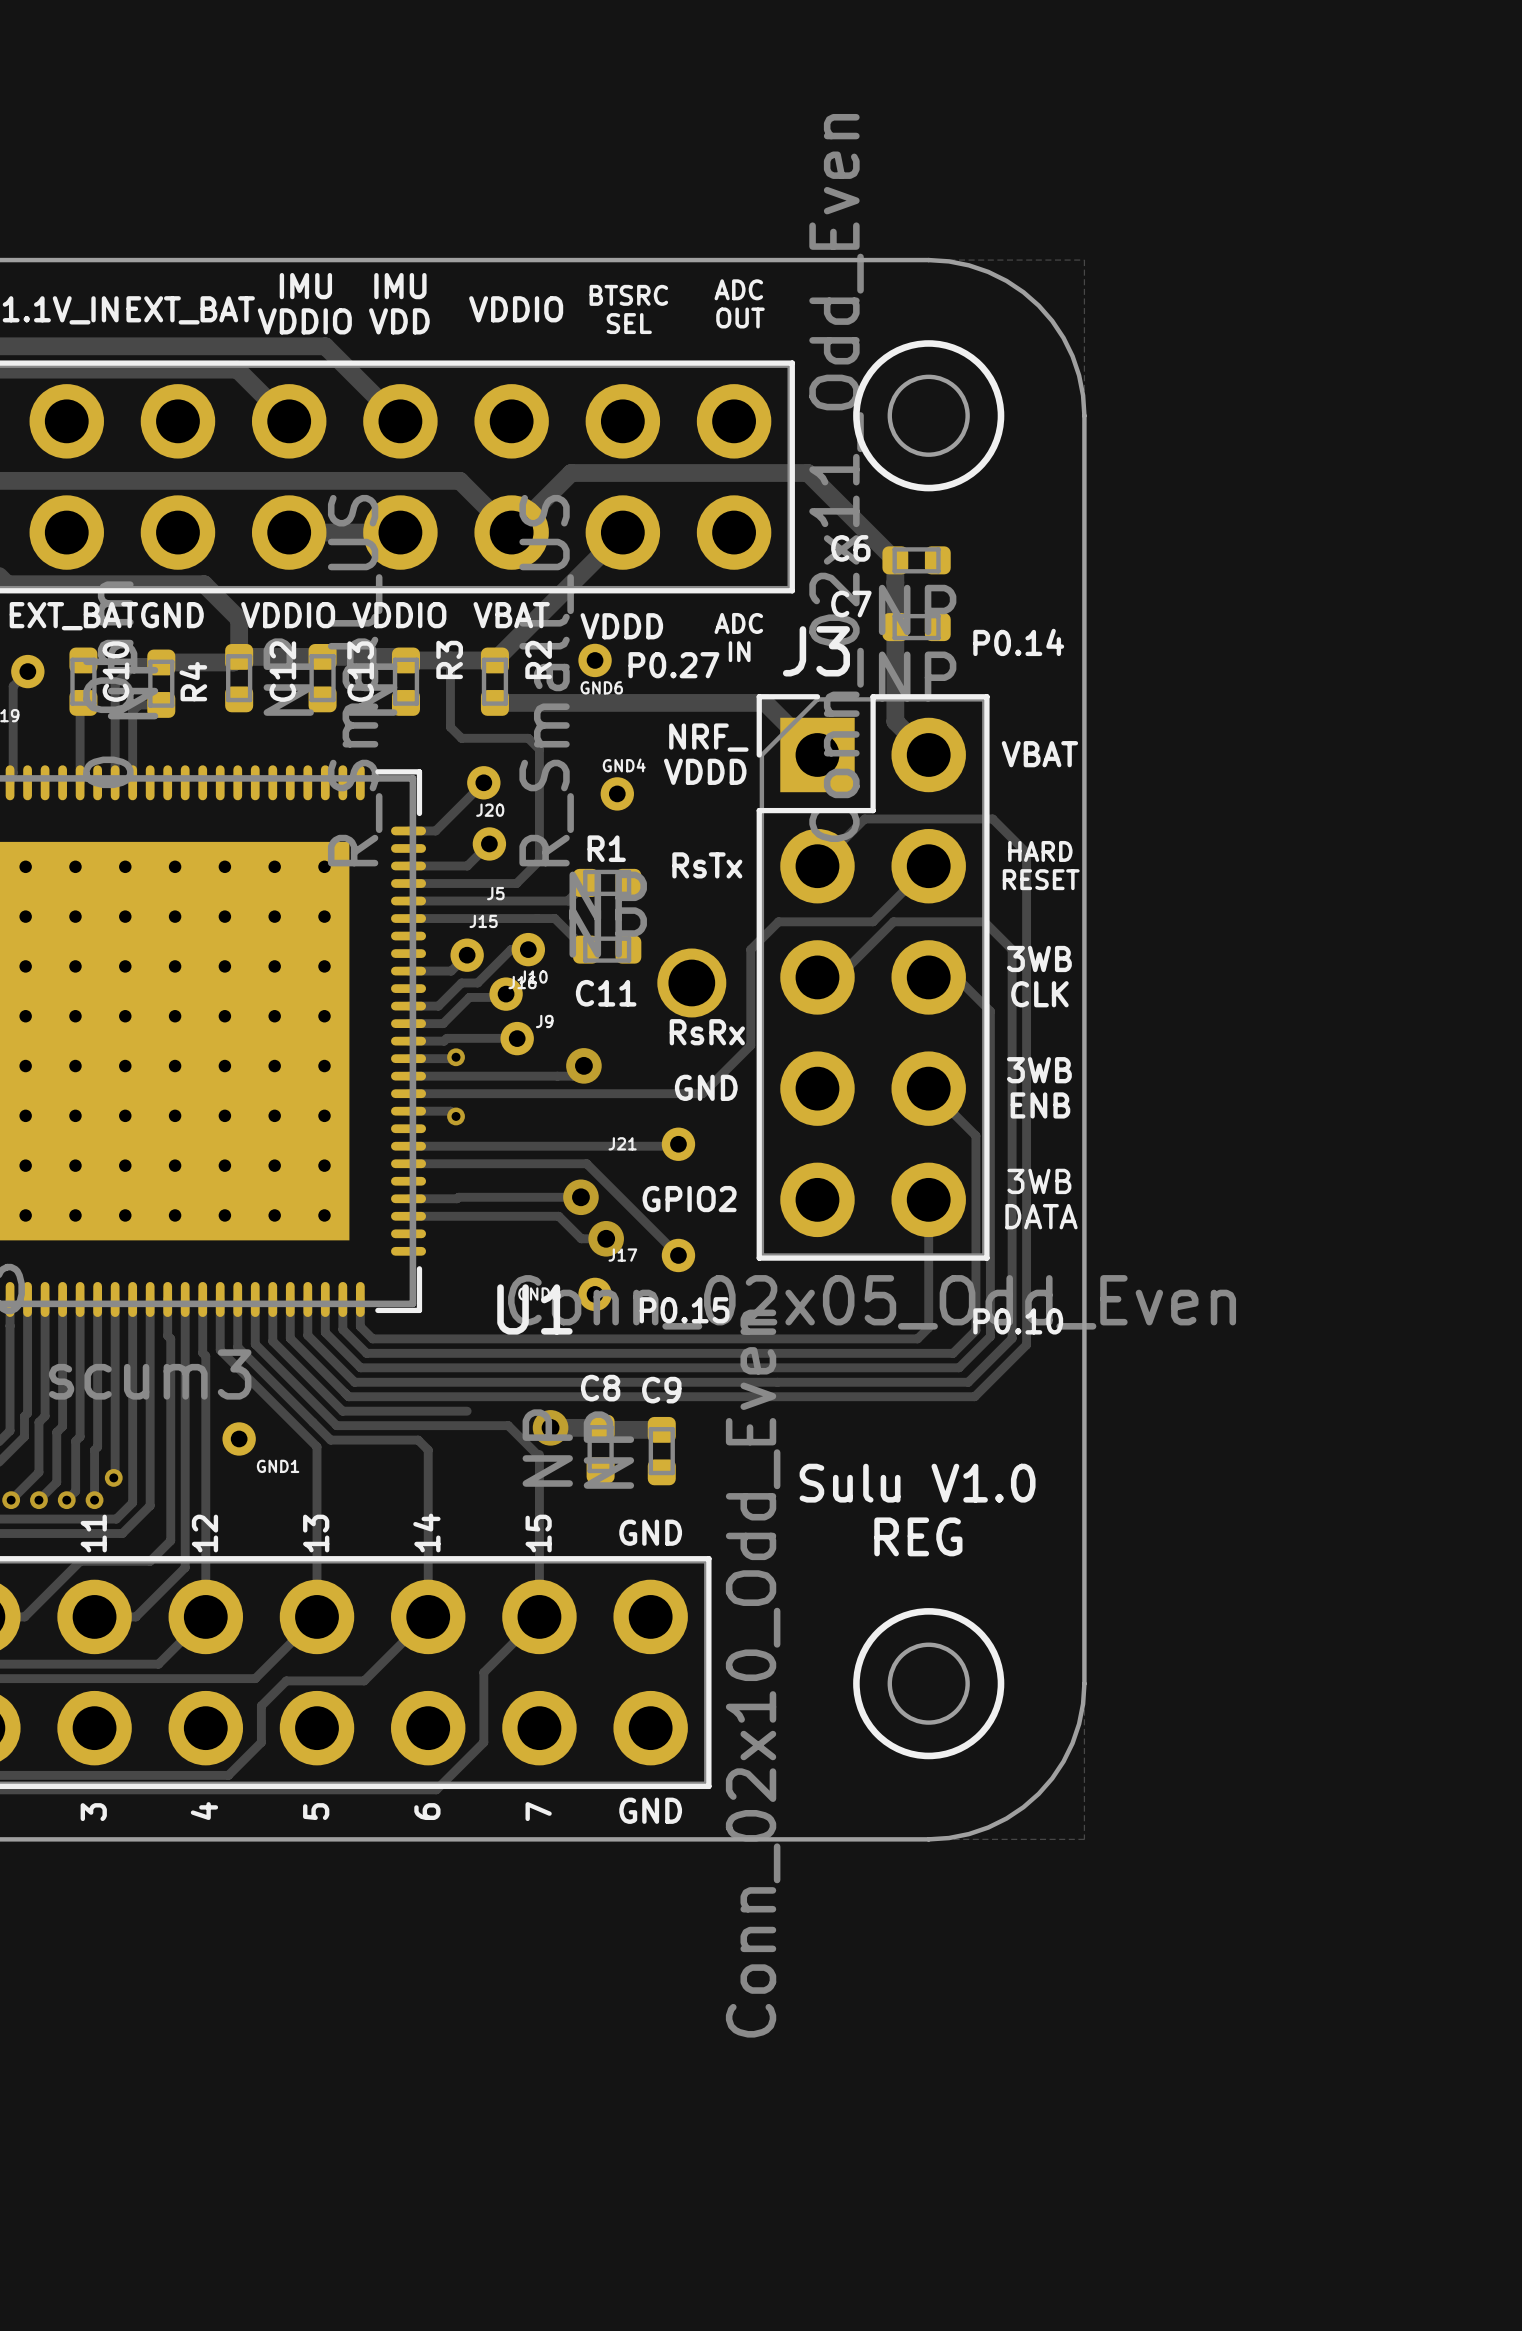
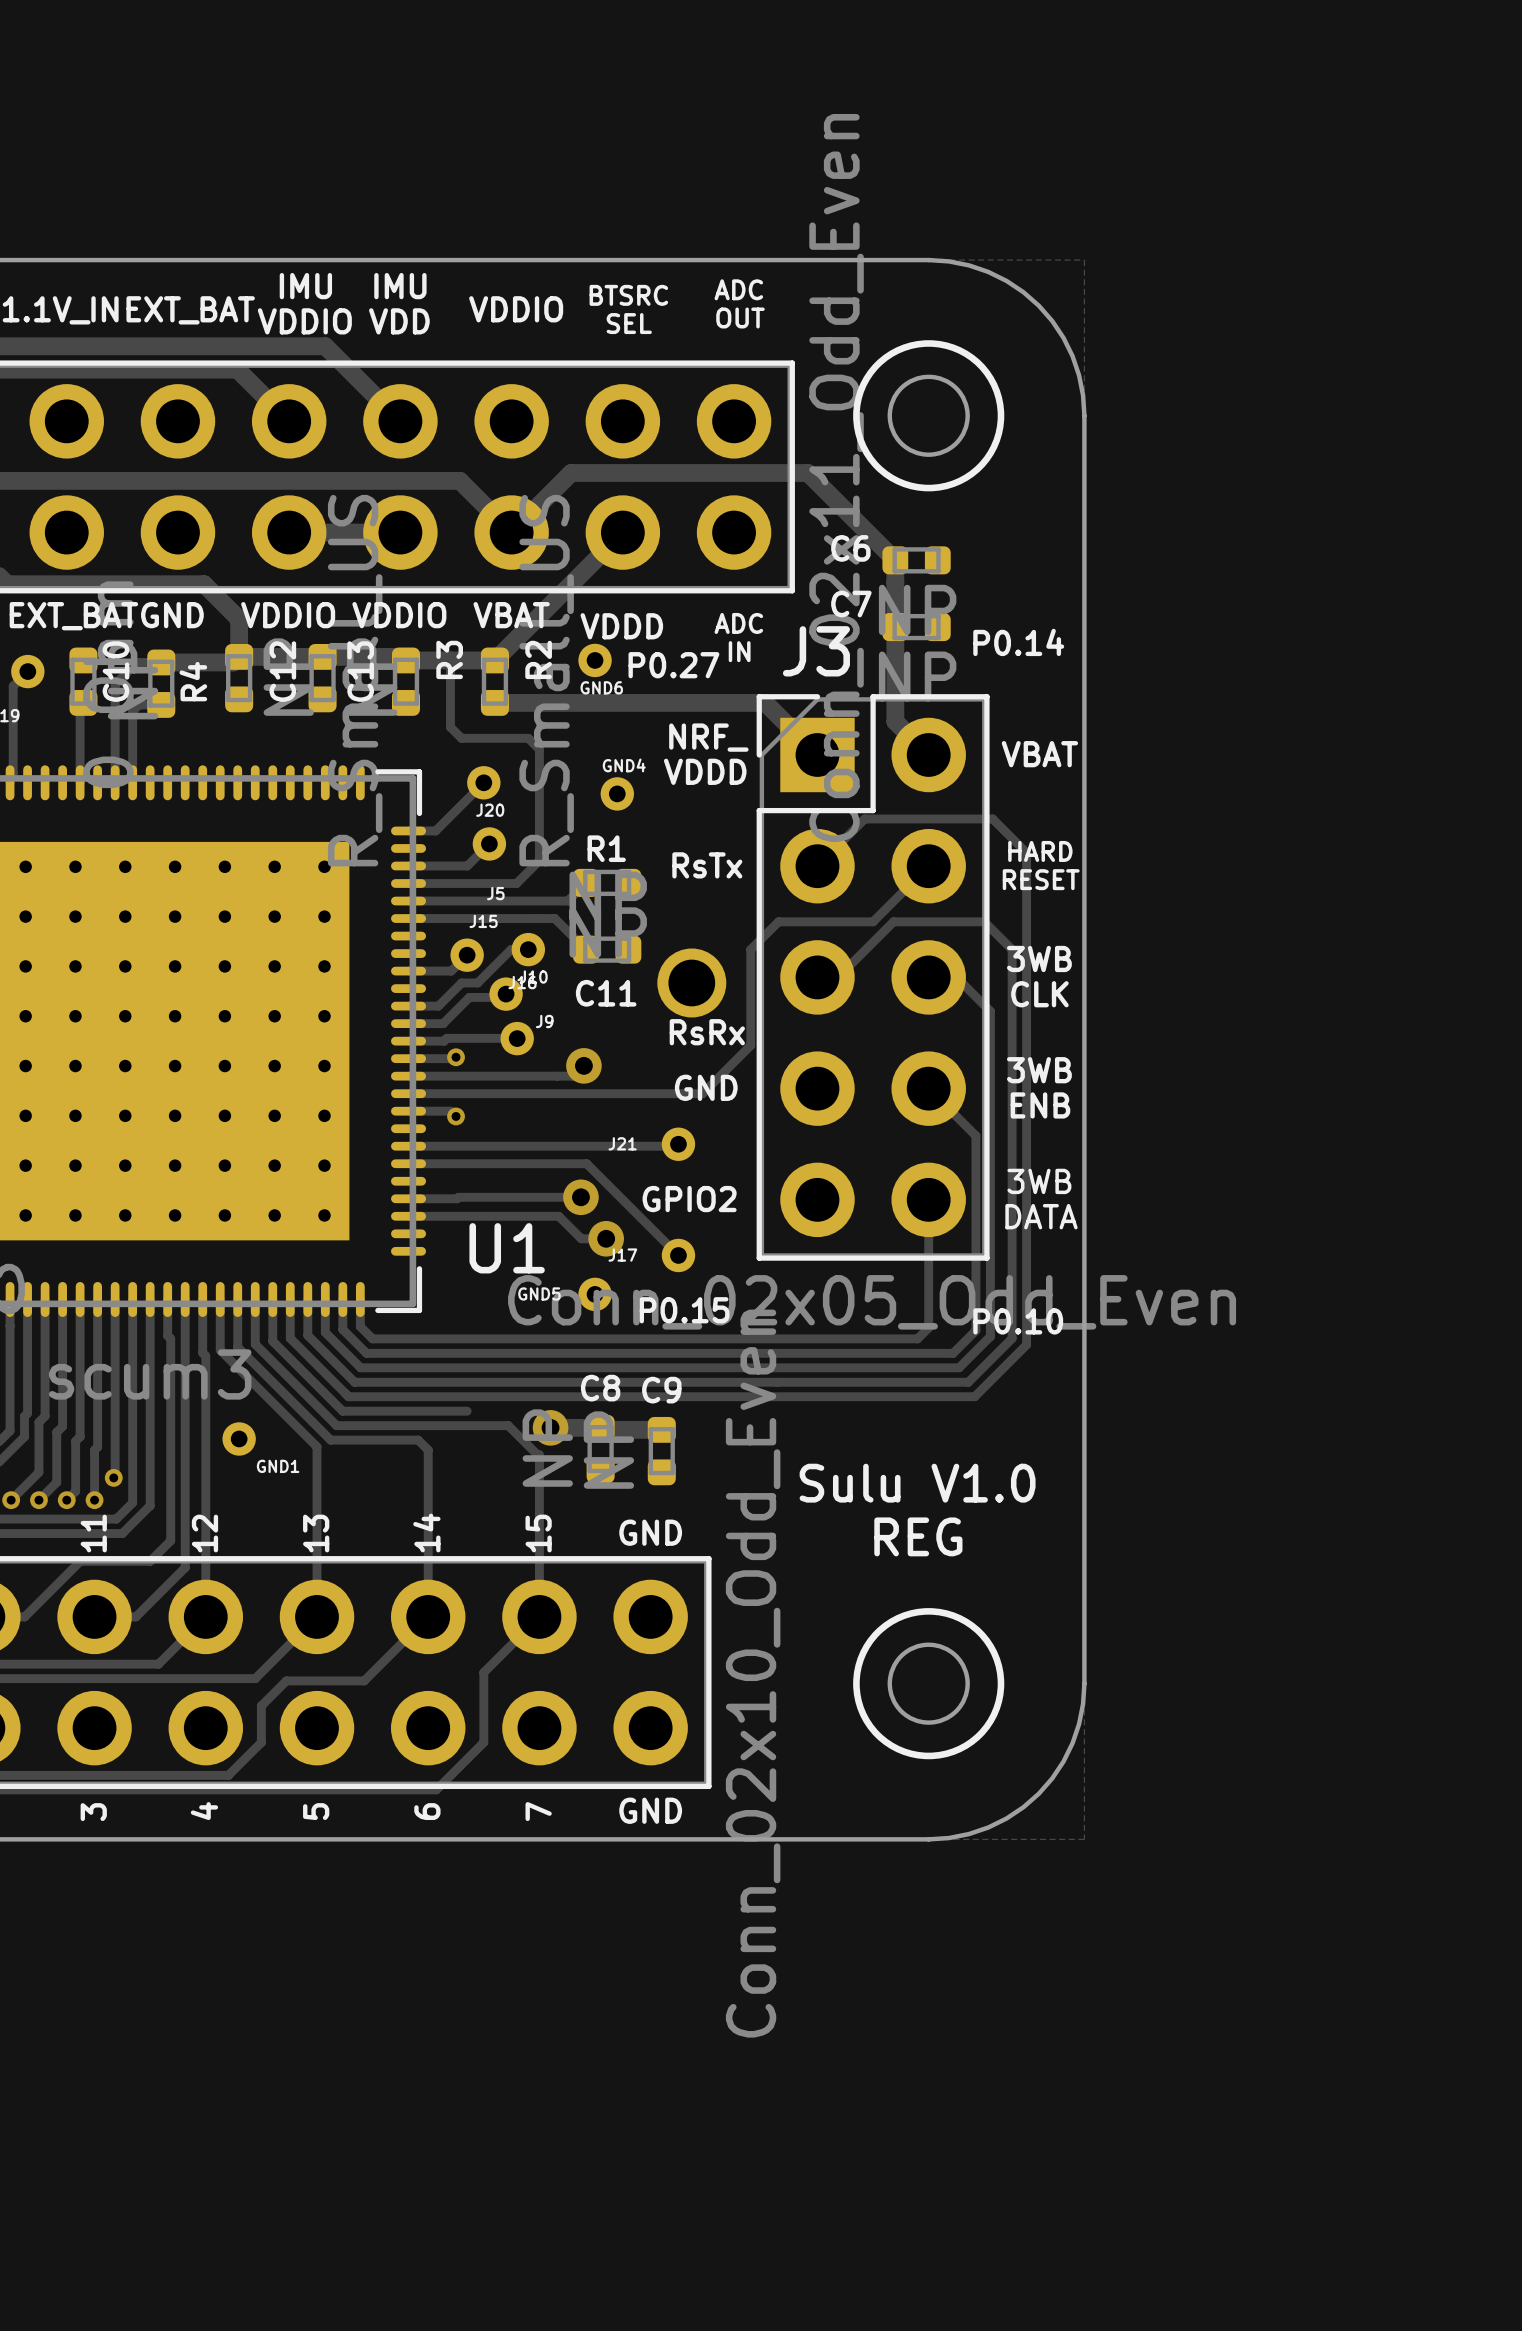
U1 name position: U1 (534, 1309) -> U1 (507, 1248)

